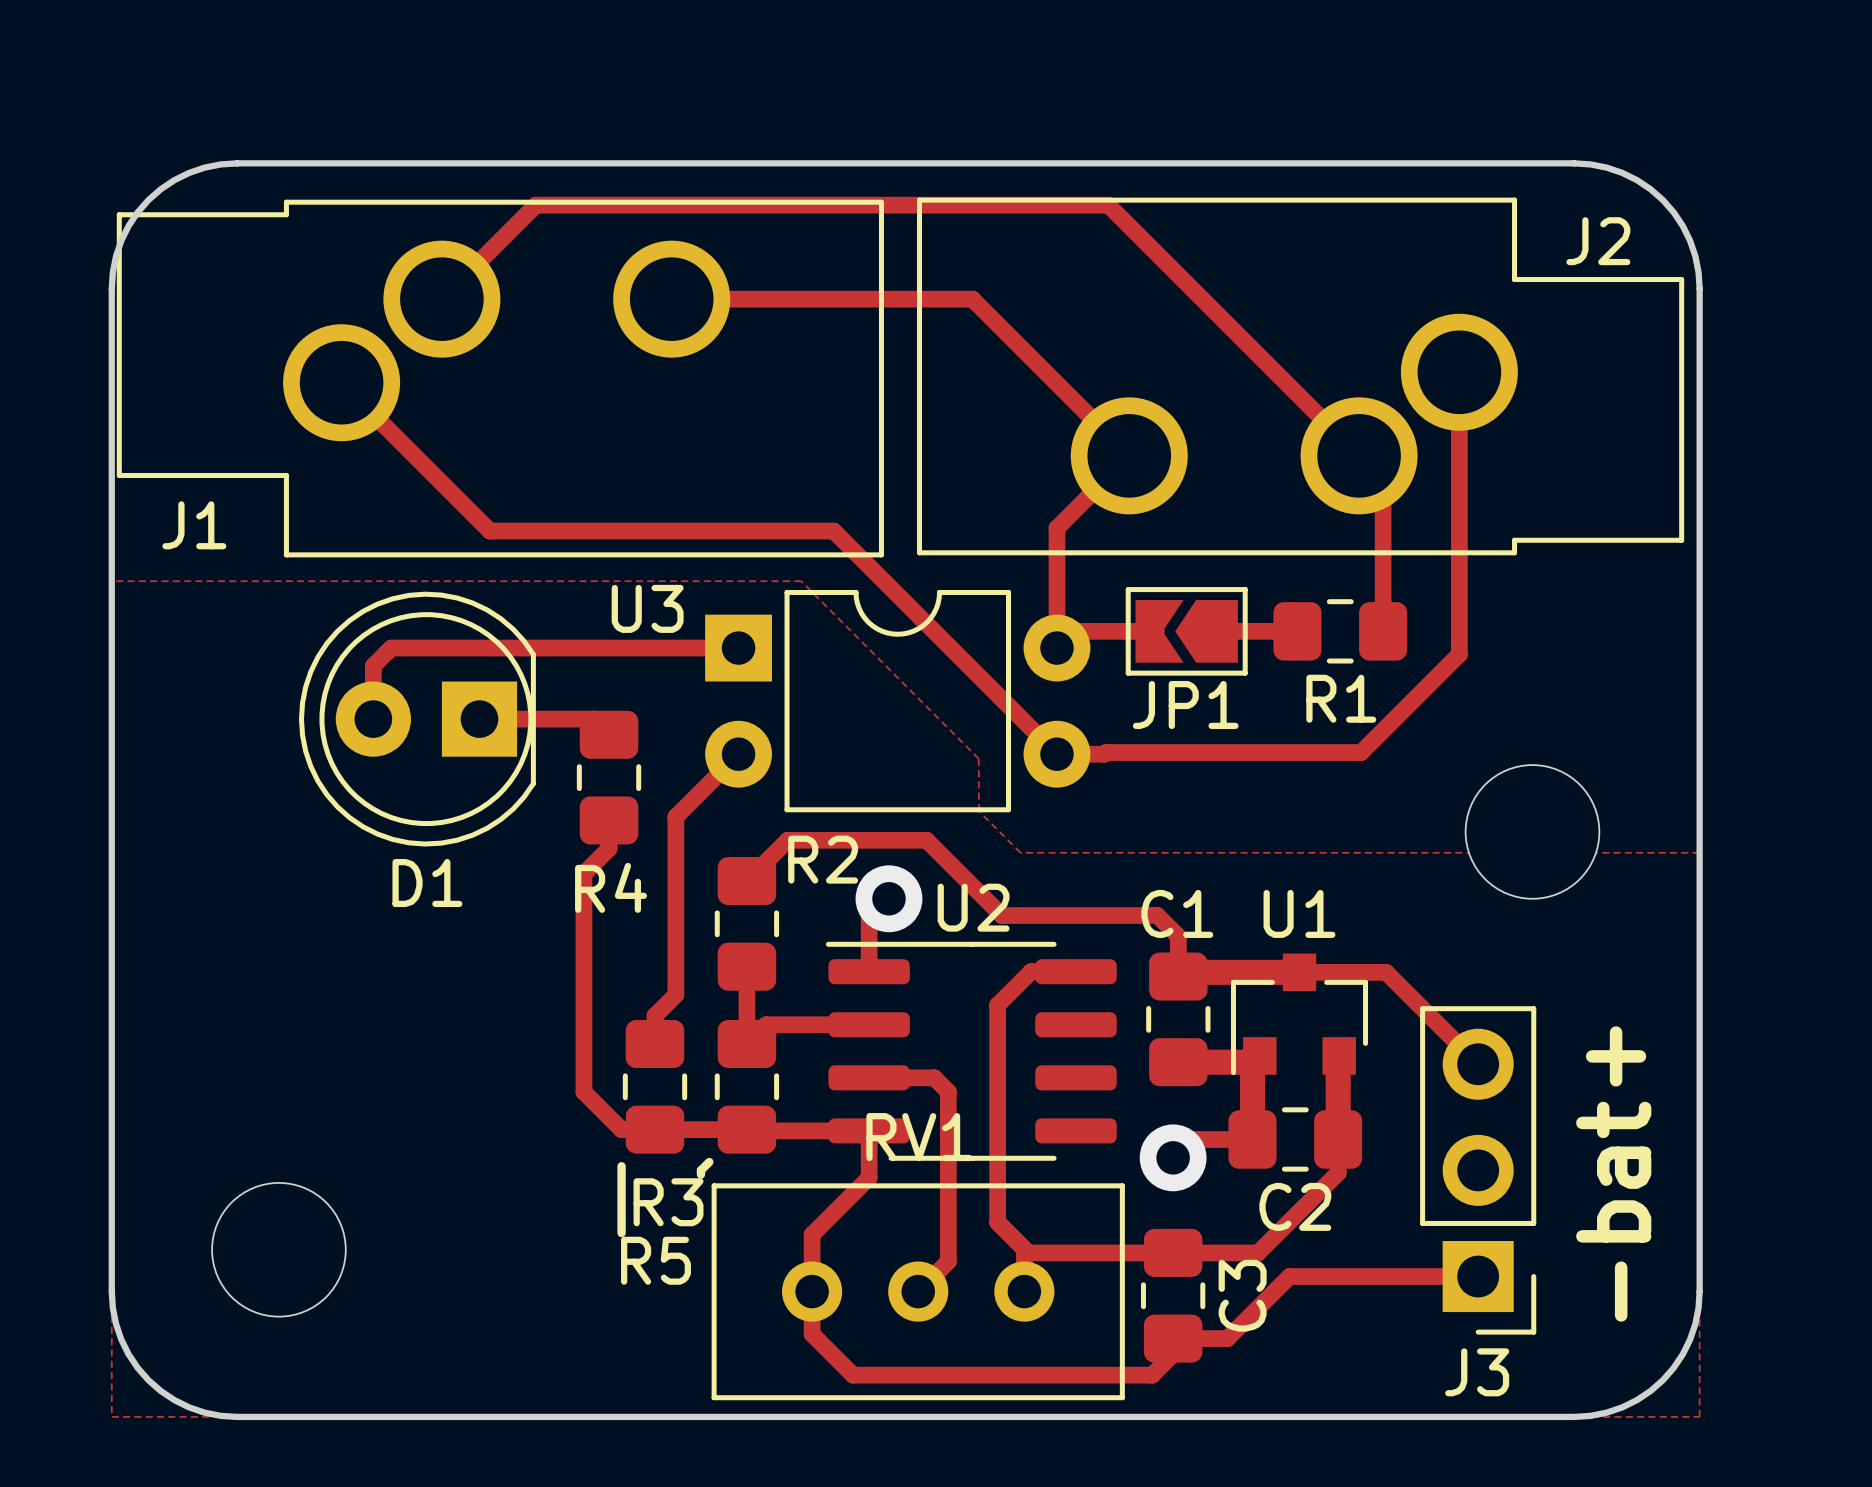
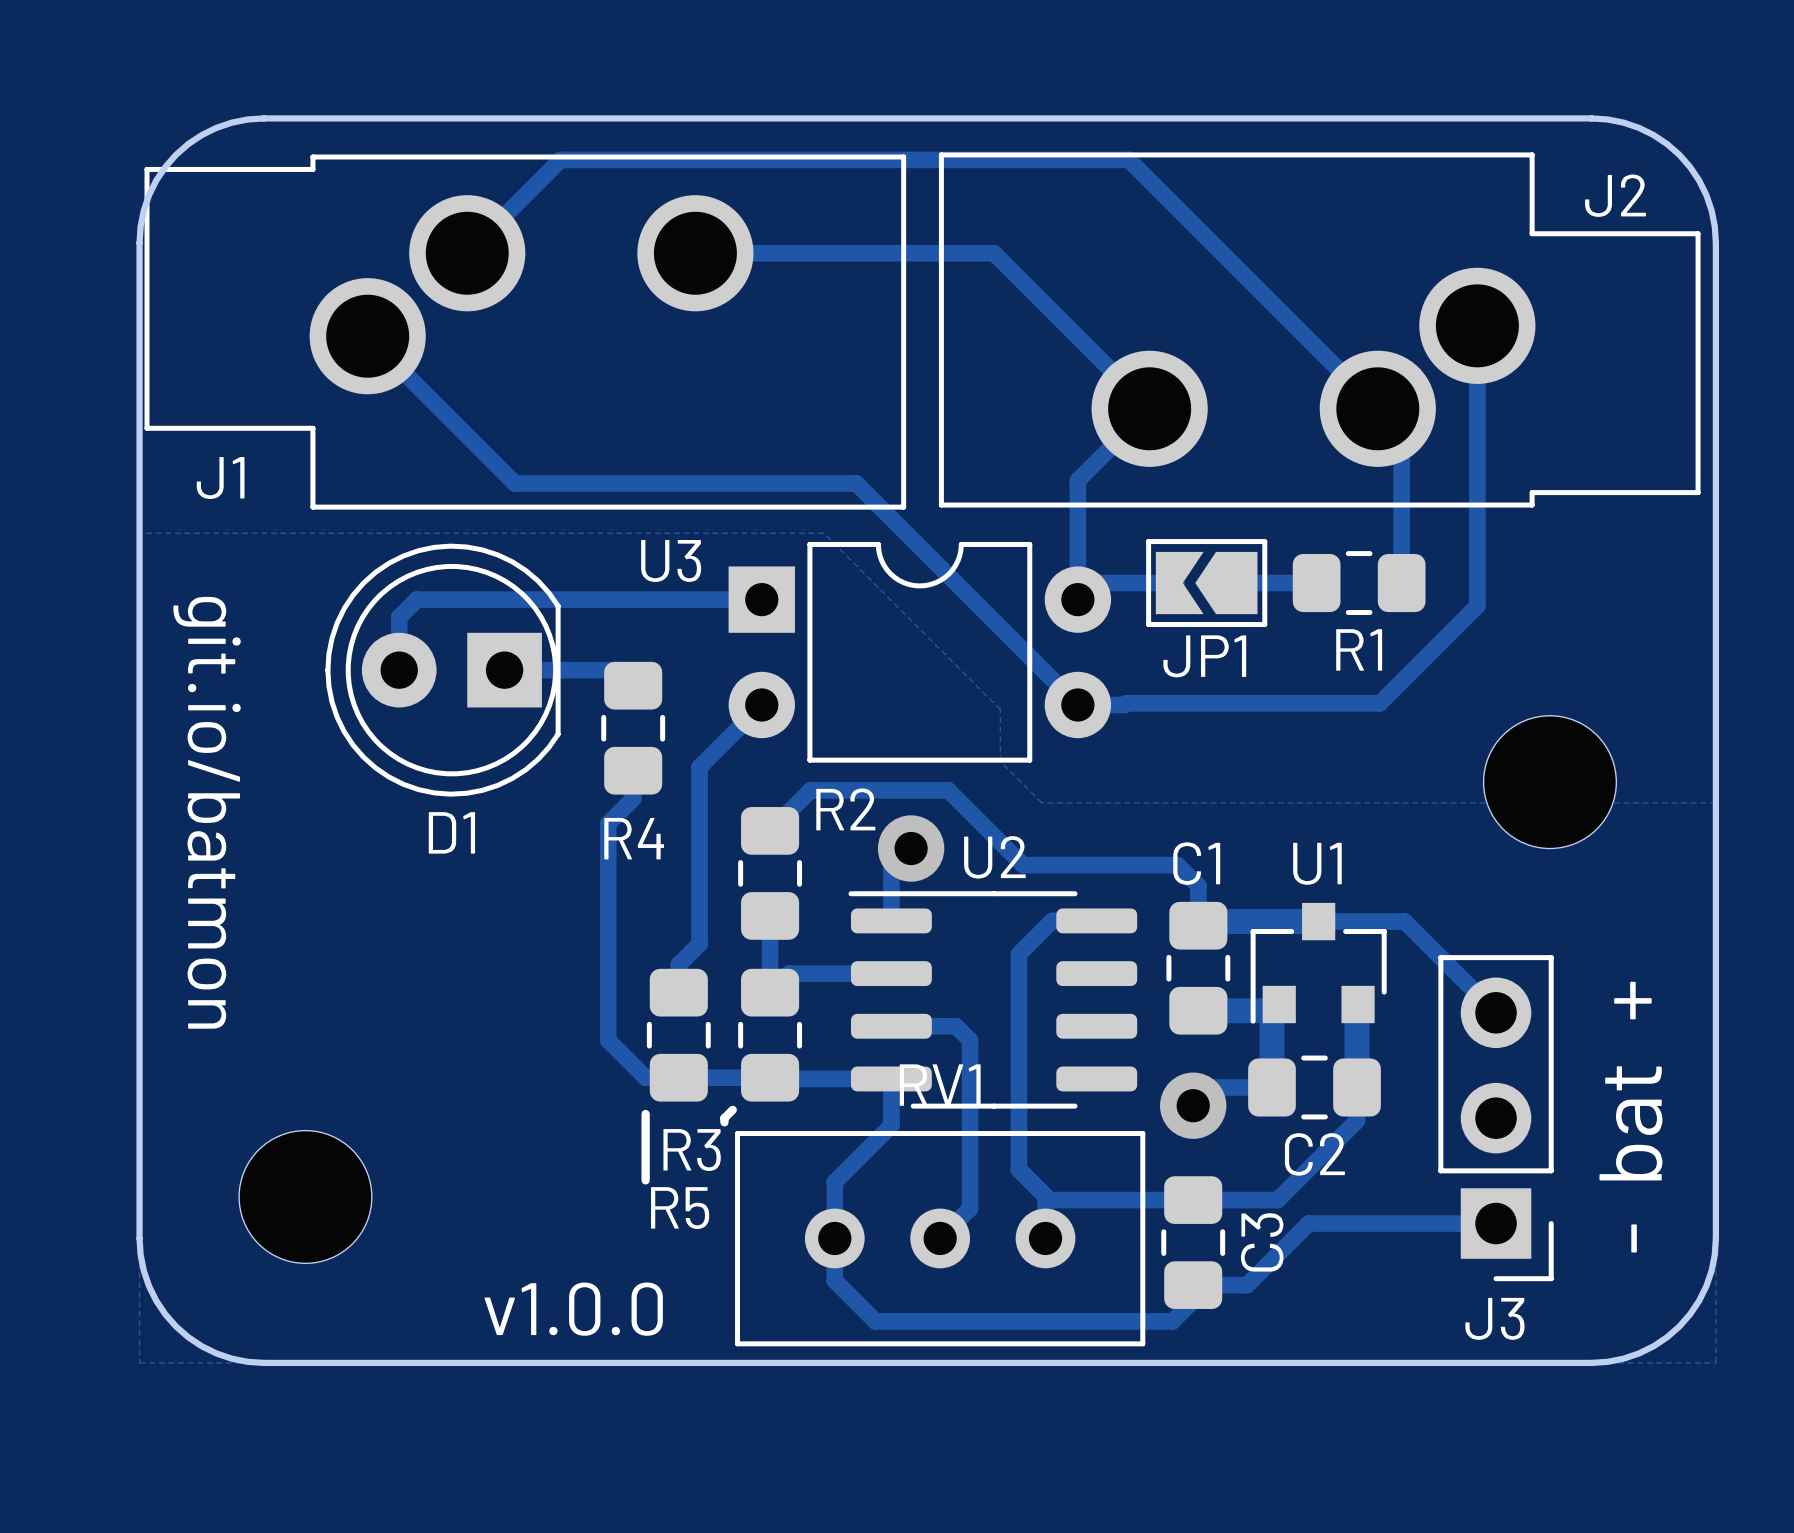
text: none -> git.io/batmon (207, 812)
text: none -> v1.0.0 (573, 1309)

